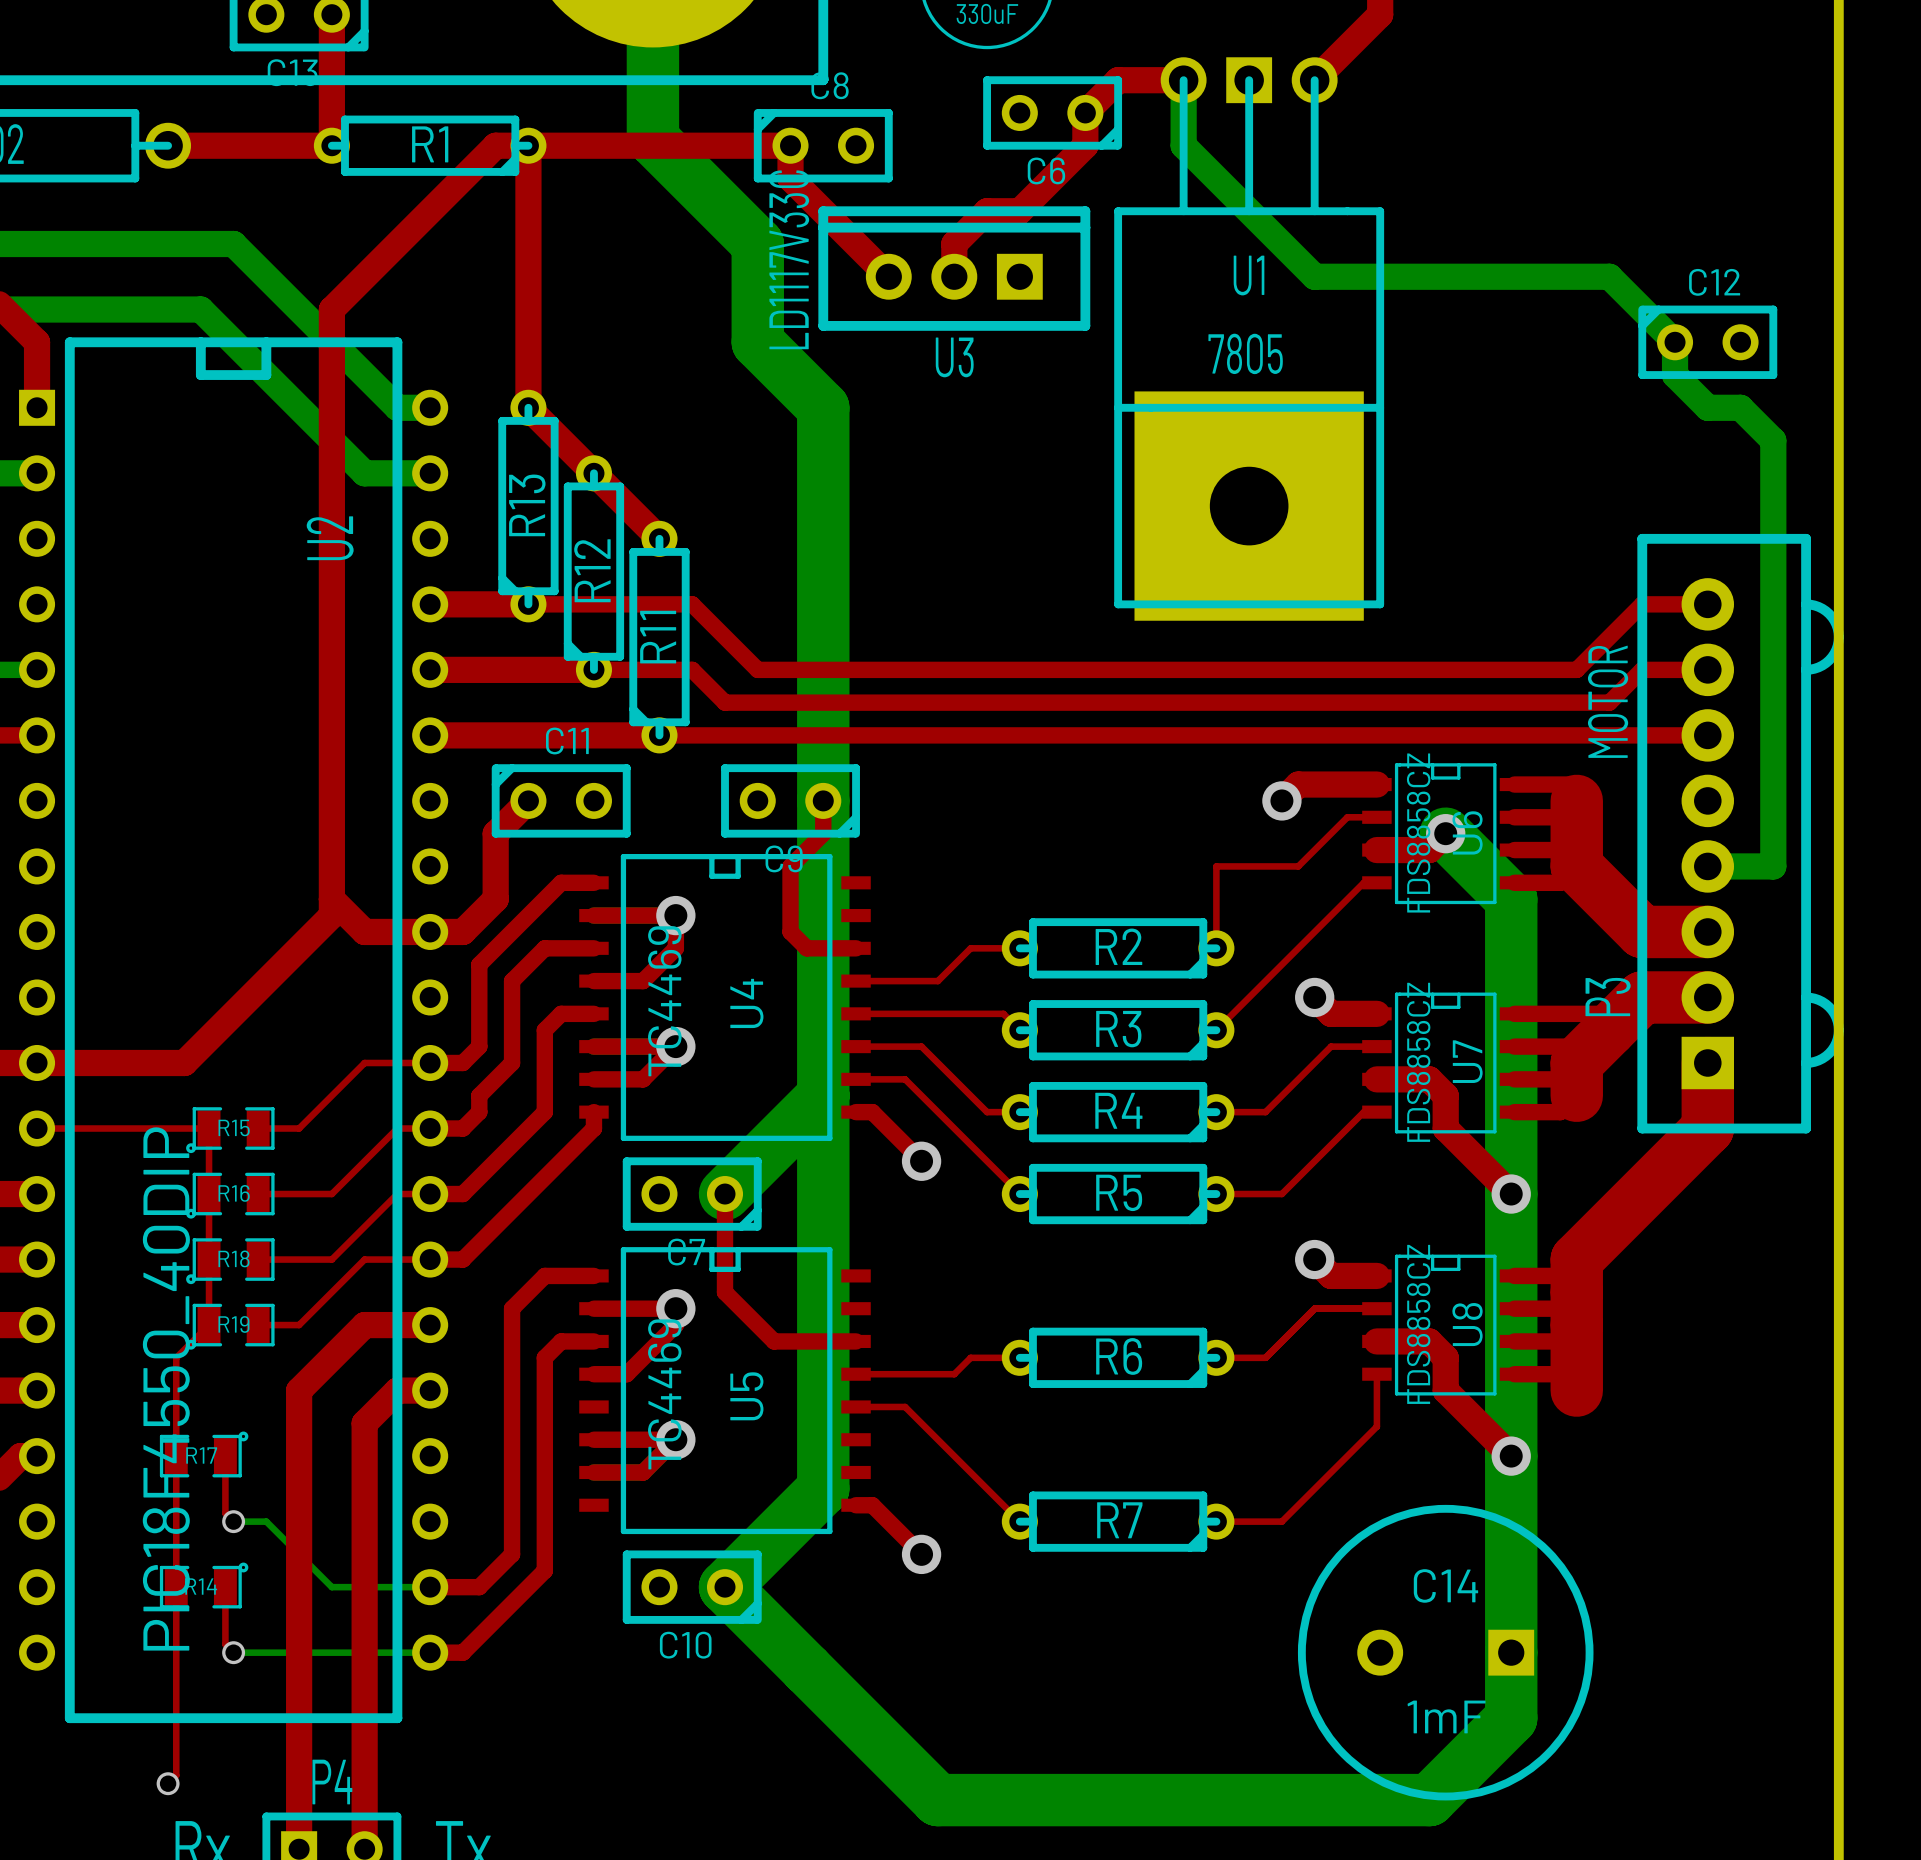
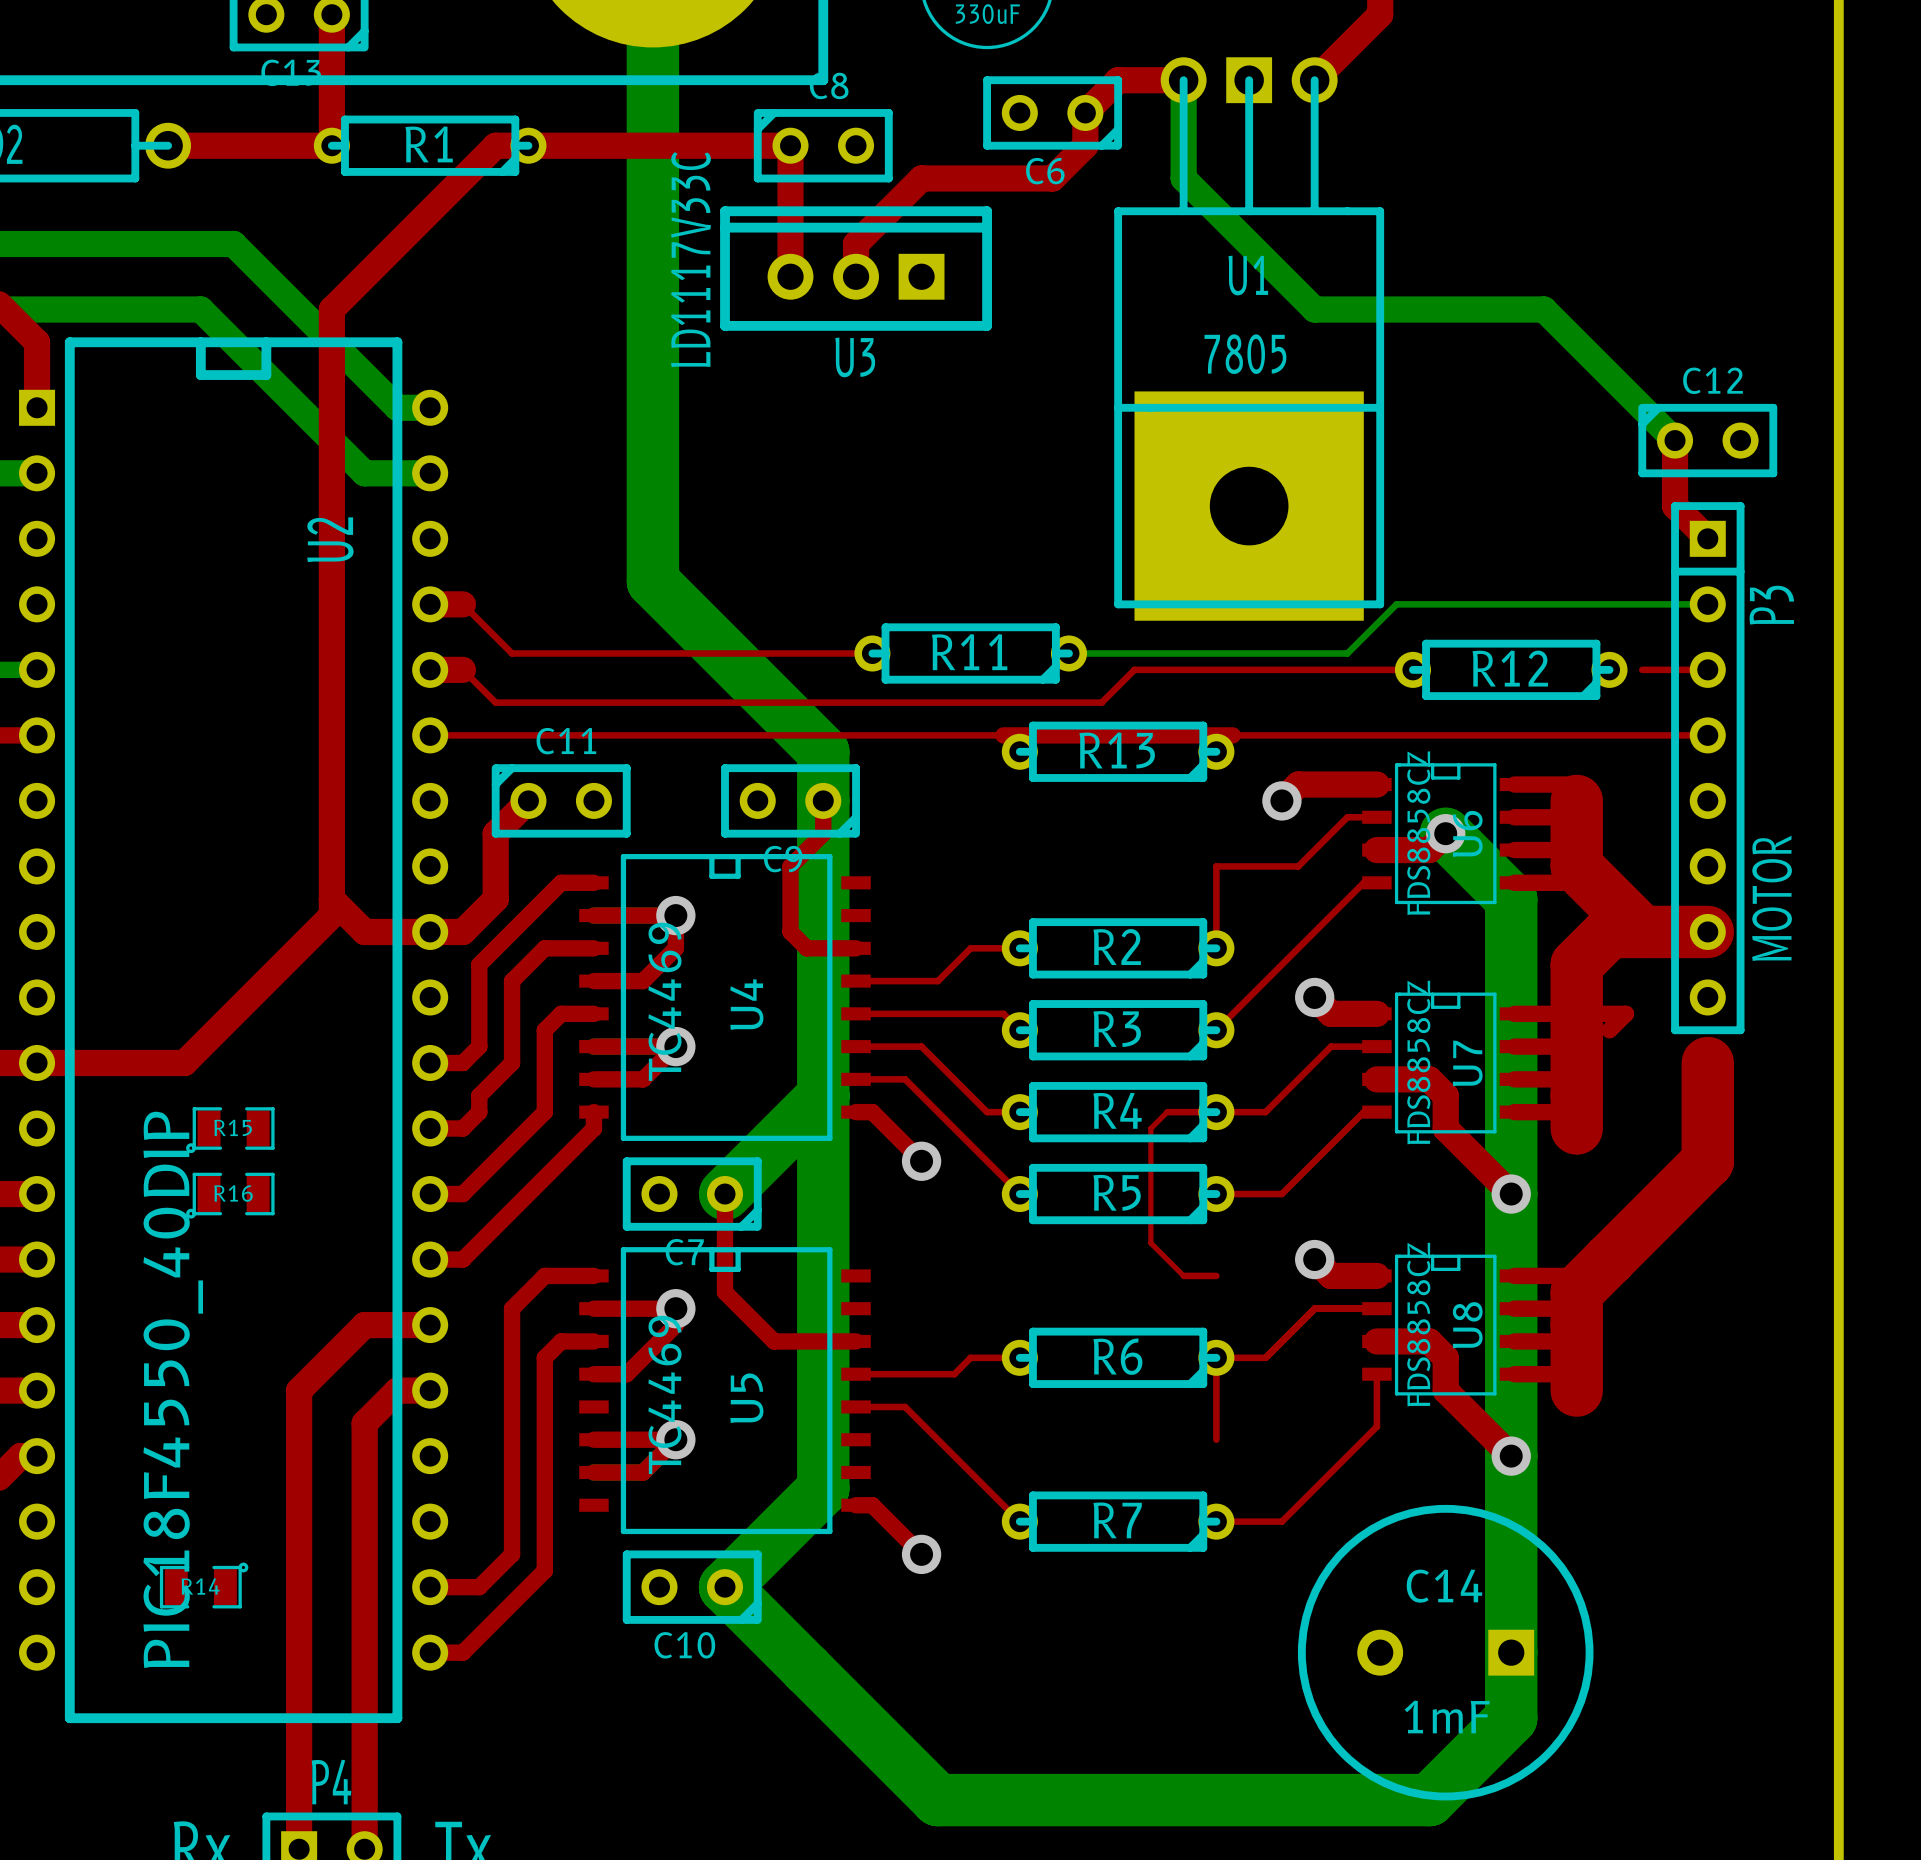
bottom track: (652, 139) (757, 244) (757, 342) (823, 407) (823, 751) -> (652, 139) (652, 581) (823, 751)
top track: (528, 145) (528, 407) (659, 538) -> none
bottom track: (1183, 145) (1314, 276) (1609, 276) (1675, 342) (1675, 375) (1707, 407) (1740, 407) (1773, 440) (1773, 866) (1707, 866) -> (1183, 145) (1183, 178) (1314, 309) (1543, 309) (1675, 440)
top track: (790, 178) (888, 276) -> (790, 178) (790, 276)
top track: (1052, 178) (1019, 211) (987, 211) (954, 244) (954, 276) -> (1052, 178) (921, 178) (856, 244) (856, 276)
U3 position: (954, 268) -> (856, 268)
C12 position: (1707, 342) -> (1707, 440)
top track: none -> (1675, 440) (1675, 506) (1707, 538)
R13 rotation: 0° (528, 506) -> 90° counterclockwise (1118, 751)
R13 position: (528, 506) -> (1118, 751)
P3 footprint: [1637, 533, 1844, 1134] -> [1671, 502, 1745, 1035]
R12 rotation: 0° (593, 571) -> 90° counterclockwise (1511, 669)
R12 position: (593, 571) -> (1511, 669)
top track: (462, 604) (692, 604) (757, 669) (1134, 669) -> (462, 604) (512, 653) (872, 653)
bottom track: none -> (1707, 604) (1396, 604) (1347, 653) (1068, 653)
top track: (1707, 604) (1642, 604) (1576, 669) (1412, 669) -> none
R11 rotation: 0° (659, 637) -> 90° counterclockwise (970, 653)
R11 position: (659, 637) -> (970, 653)
top track: (462, 669) (692, 669) (725, 702) -> (462, 669) (495, 702) (725, 702)
top track width: thick (1134, 669) (1412, 669) -> thin (1134, 669) (1412, 669)
top track: (1642, 669) (1609, 702) (1101, 702) -> (1134, 669) (1101, 702)
top track width: thick (1642, 669) (1707, 669) -> thin (1642, 669) (1707, 669)
P3 value position: MOTOR (1608, 701) -> MOTOR (1772, 898)
top track width: thick (725, 702) (1101, 702) -> thin (725, 702) (1101, 702)
top track width: thick (430, 735) (1003, 735) -> thin (430, 735) (1003, 735)
top track width: thick (1232, 735) (1707, 735) -> thin (1232, 735) (1707, 735)
P3 name position: P3 (1608, 997) -> P3 (1771, 605)
top track: (1707, 997) (1642, 997) (1576, 1062) -> (1642, 931) (1609, 931) (1576, 964) (1576, 1062)
top track: (430, 1062) (364, 1062) (299, 1128) (258, 1128) -> none
top track: none -> (1576, 1095) (1576, 1128)
top track: none -> (1216, 1112) (1167, 1112) (1150, 1128) (1150, 1243) (1183, 1275)
top track: (37, 1128) (209, 1128) (209, 1325) (176, 1357) (176, 1775) (168, 1783) -> none
top track: (430, 1128) (397, 1128) (331, 1194) (258, 1194) -> none
top track: (1707, 1128) (1576, 1259) (1576, 1292) -> (1707, 1128) (1707, 1161) (1576, 1292)
top track: (430, 1194) (397, 1194) (331, 1259) (258, 1259) -> none
top track: (430, 1259) (364, 1259) (299, 1325) (258, 1325) -> none
R18: (230, 1261) -> none
top track: none -> (1183, 1275) (1216, 1275) (1183, 1275)
R19: (230, 1326) -> none
top track: none -> (1216, 1357) (1216, 1439)
R17: (204, 1454) -> none
top track: (225, 1456) (225, 1513) (233, 1521) -> none
bottom track: (233, 1521) (266, 1521) (331, 1587) (430, 1587) -> none
via: (233, 1521) -> none
top track: (225, 1587) (225, 1644) (233, 1652) -> none
bottom track: (233, 1652) (430, 1652) -> none
via: (233, 1652) -> none
via: (168, 1783) -> none

